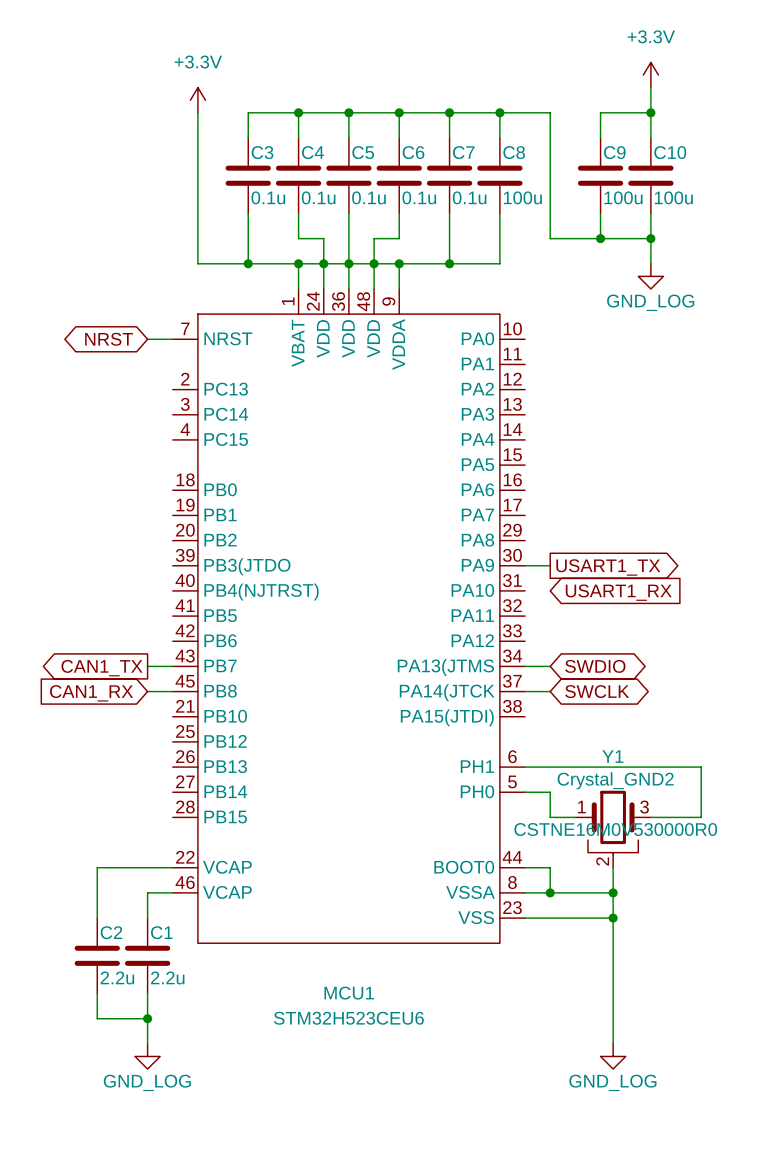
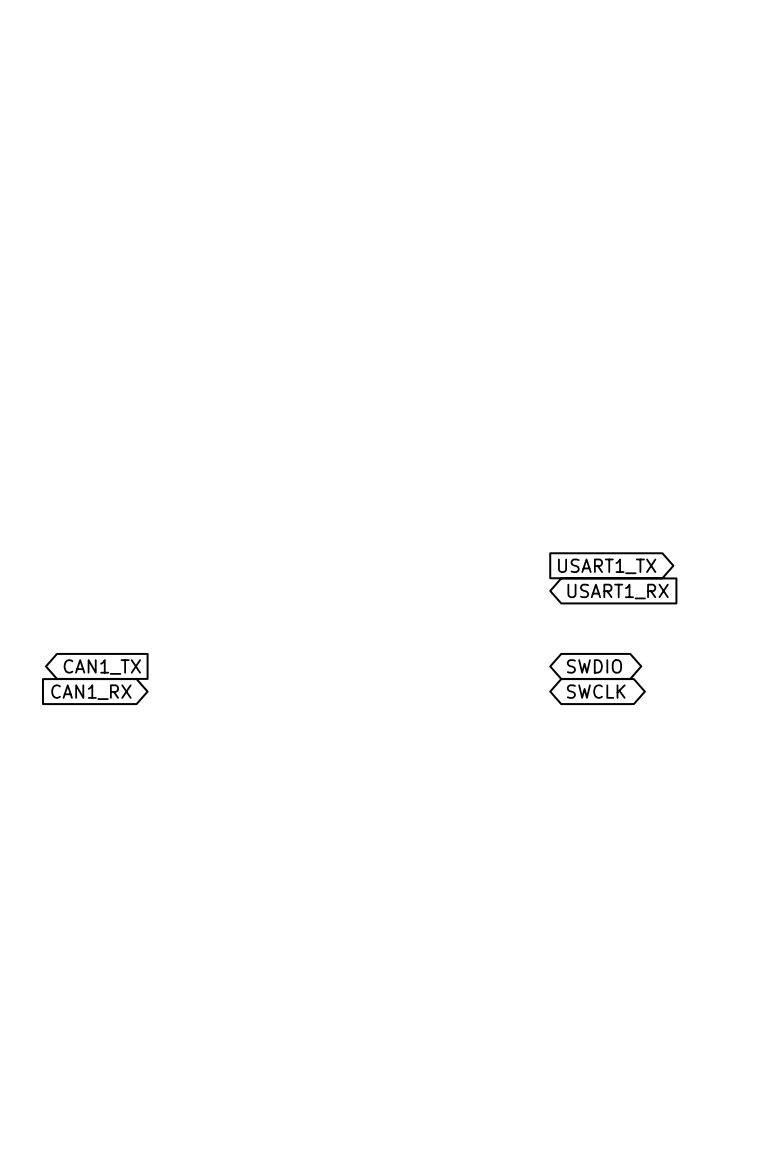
power symbol: +3.3V (650, 75) -> none
wire: (650, 87) (650, 137) -> none
power symbol: +3.3V (197, 100) -> none
wire: (197, 112) (197, 263) (499, 263) (499, 213) -> none
wire: (298, 112) (298, 137) -> none
junction: (298, 112) -> none
wire: (348, 112) (348, 137) -> none
junction: (348, 112) -> none
wire: (399, 112) (399, 137) -> none
junction: (399, 112) -> none
wire: (449, 112) (449, 137) -> none
junction: (449, 112) -> none
wire: (499, 112) (499, 137) -> none
junction: (499, 112) -> none
wire: (650, 112) (600, 112) (600, 137) -> none
junction: (650, 112) -> none
wire: (248, 137) (248, 112) (550, 112) (550, 238) (650, 238) -> none
C3: 0.1u (248, 175) -> none
C4: 0.1u (298, 175) -> none
C5: 0.1u (348, 175) -> none
C6: 0.1u (399, 175) -> none
C7: 0.1u (449, 175) -> none
C8: 100u (499, 175) -> none
C9: 100u (600, 175) -> none
C10: 100u (650, 175) -> none
wire: (248, 213) (248, 263) -> none
wire: (298, 213) (298, 238) (323, 238) (323, 288) -> none
wire: (348, 213) (348, 288) -> none
wire: (399, 213) (399, 238) (374, 238) (374, 288) -> none
wire: (449, 213) (449, 263) -> none
wire: (600, 213) (600, 238) -> none
wire: (650, 213) (650, 263) -> none
junction: (600, 238) -> none
junction: (650, 238) -> none
junction: (248, 263) -> none
wire: (298, 263) (298, 288) -> none
junction: (298, 263) -> none
junction: (323, 263) -> none
junction: (348, 263) -> none
junction: (374, 263) -> none
wire: (399, 263) (399, 288) -> none
junction: (399, 263) -> none
junction: (449, 263) -> none
power symbol: GND_LOG (650, 276) -> none
global label: NRST (109, 339) -> none
wire: (147, 339) (172, 339) -> none
wire: (525, 565) (550, 565) -> none
MCU1: STM32H523CEU6 (348, 616) -> none
wire: (147, 666) (172, 666) -> none
wire: (525, 666) (550, 666) -> none
wire: (147, 691) (172, 691) -> none
wire: (525, 691) (550, 691) -> none
wire: (525, 767) (701, 767) (701, 817) (650, 817) -> none
wire: (525, 792) (550, 792) (550, 817) (575, 817) -> none
Y1: Crystal_GND2 (613, 829) -> none
wire: (172, 867) (97, 867) (97, 918) -> none
wire: (525, 867) (550, 867) (550, 892) -> none
wire: (613, 867) (613, 1043) -> none
wire: (172, 892) (147, 892) (147, 918) -> none
wire: (525, 892) (613, 892) -> none
junction: (550, 892) -> none
junction: (613, 892) -> none
wire: (525, 918) (613, 918) -> none
junction: (613, 918) -> none
C2: 2.2u (97, 955) -> none
C1: 2.2u (147, 955) -> none
wire: (97, 993) (97, 1018) (147, 1018) -> none
wire: (147, 993) (147, 1043) -> none
junction: (147, 1018) -> none
power symbol: GND_LOG (147, 1056) -> none
power symbol: GND_LOG (613, 1056) -> none

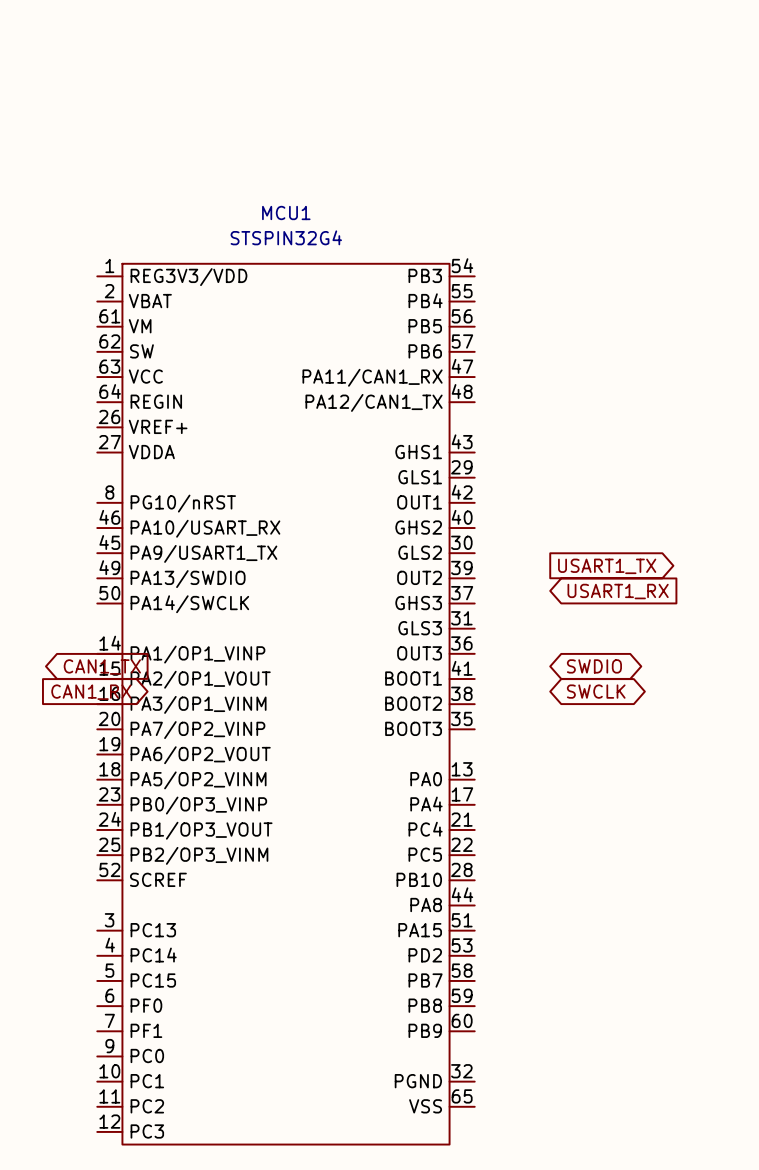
MCU1: none -> STSPIN32G4 (286, 704)

